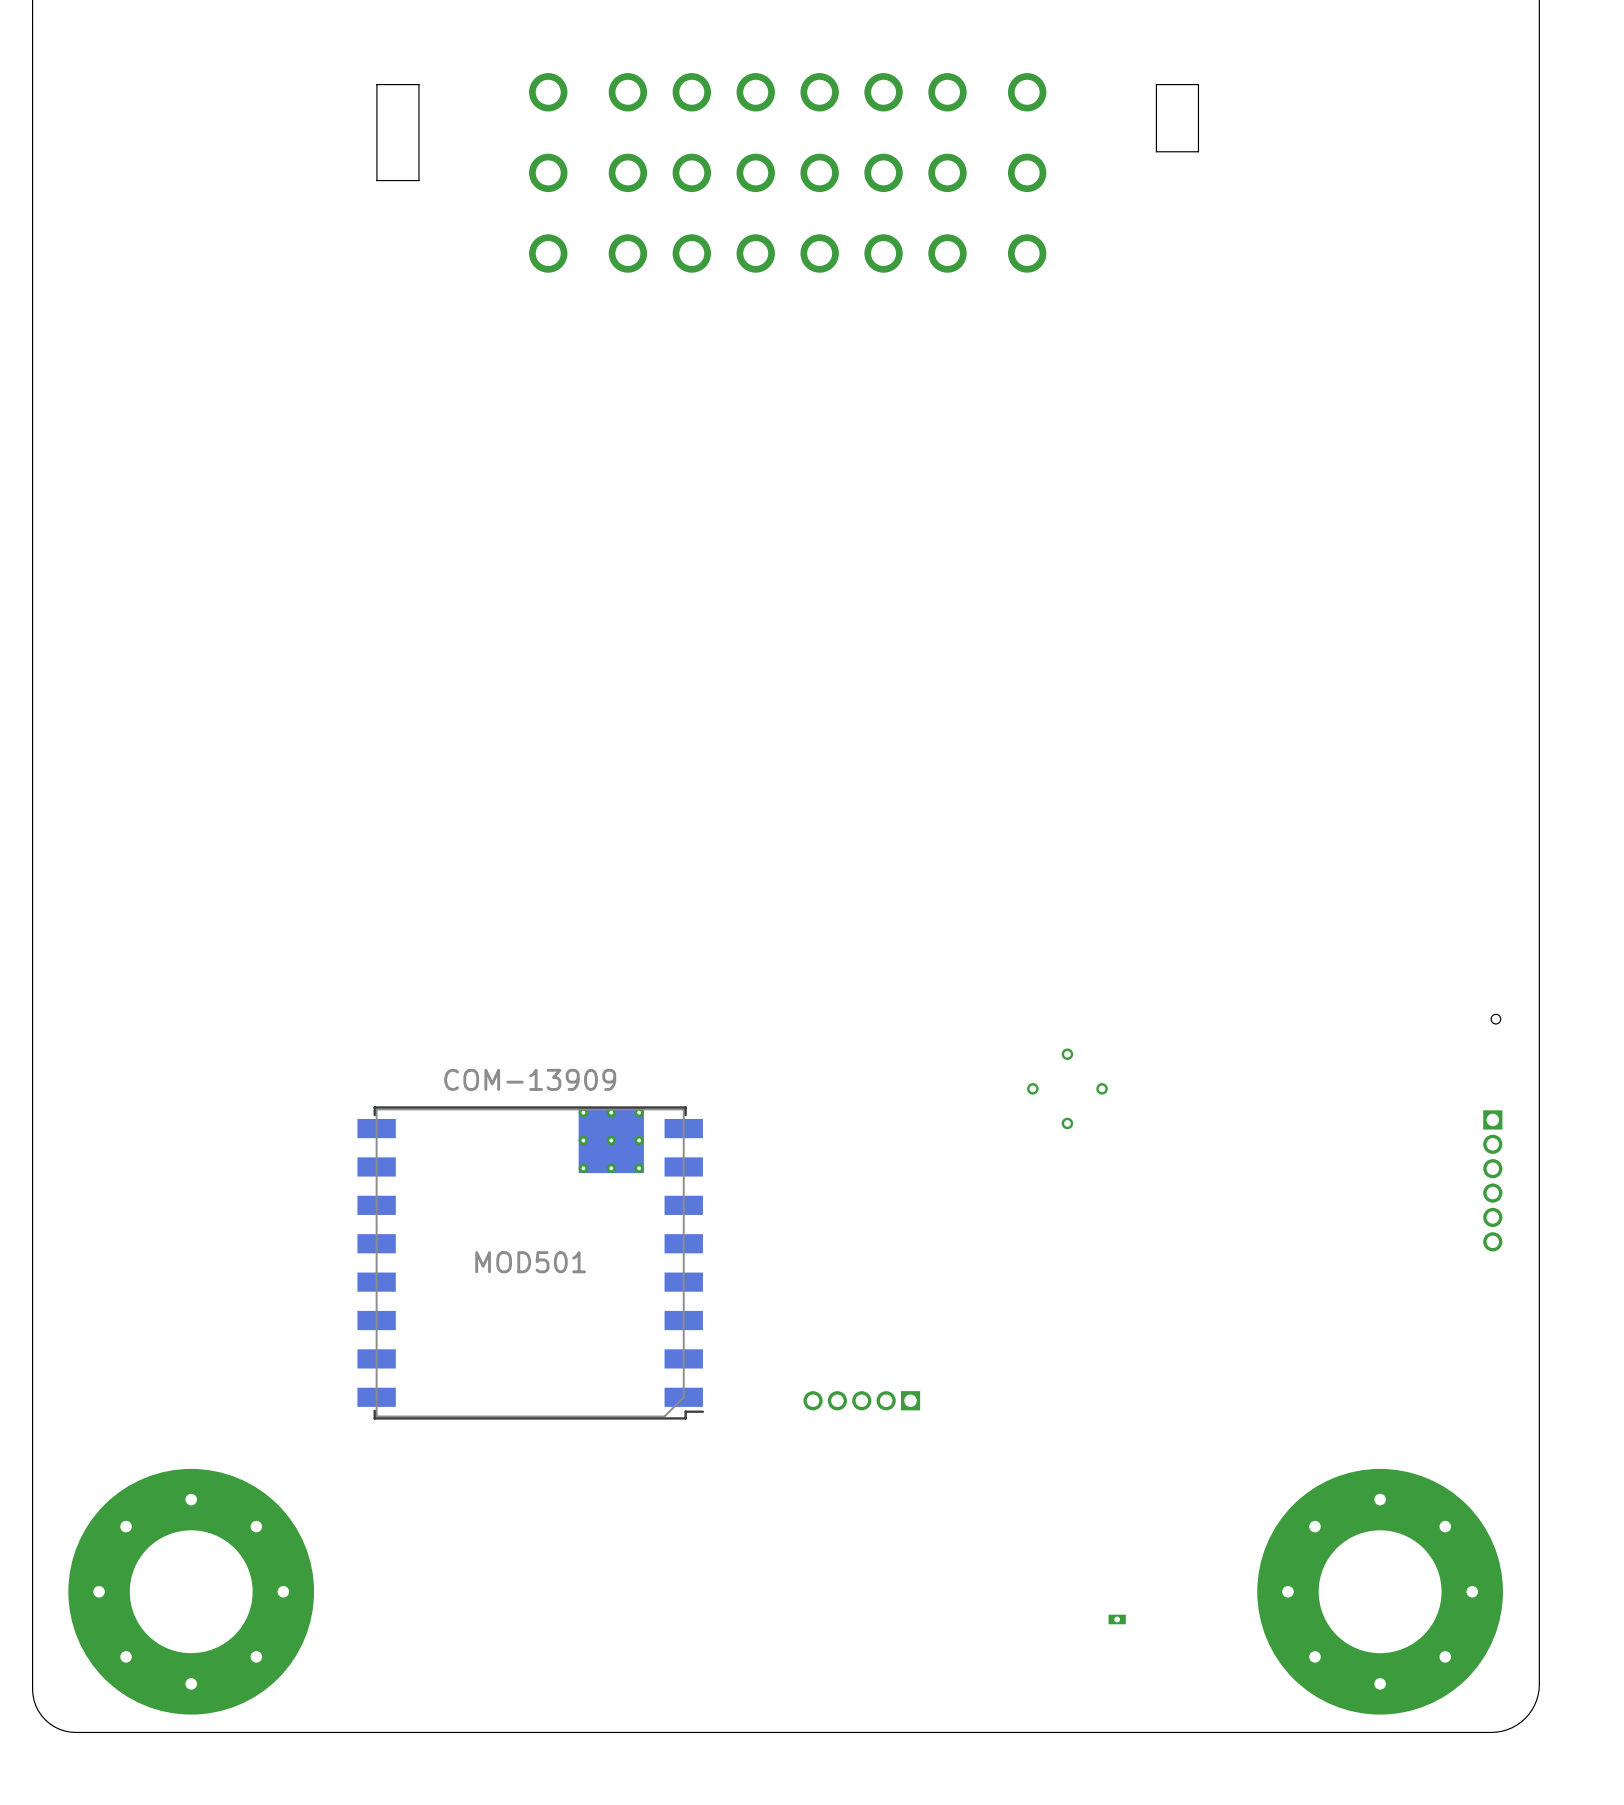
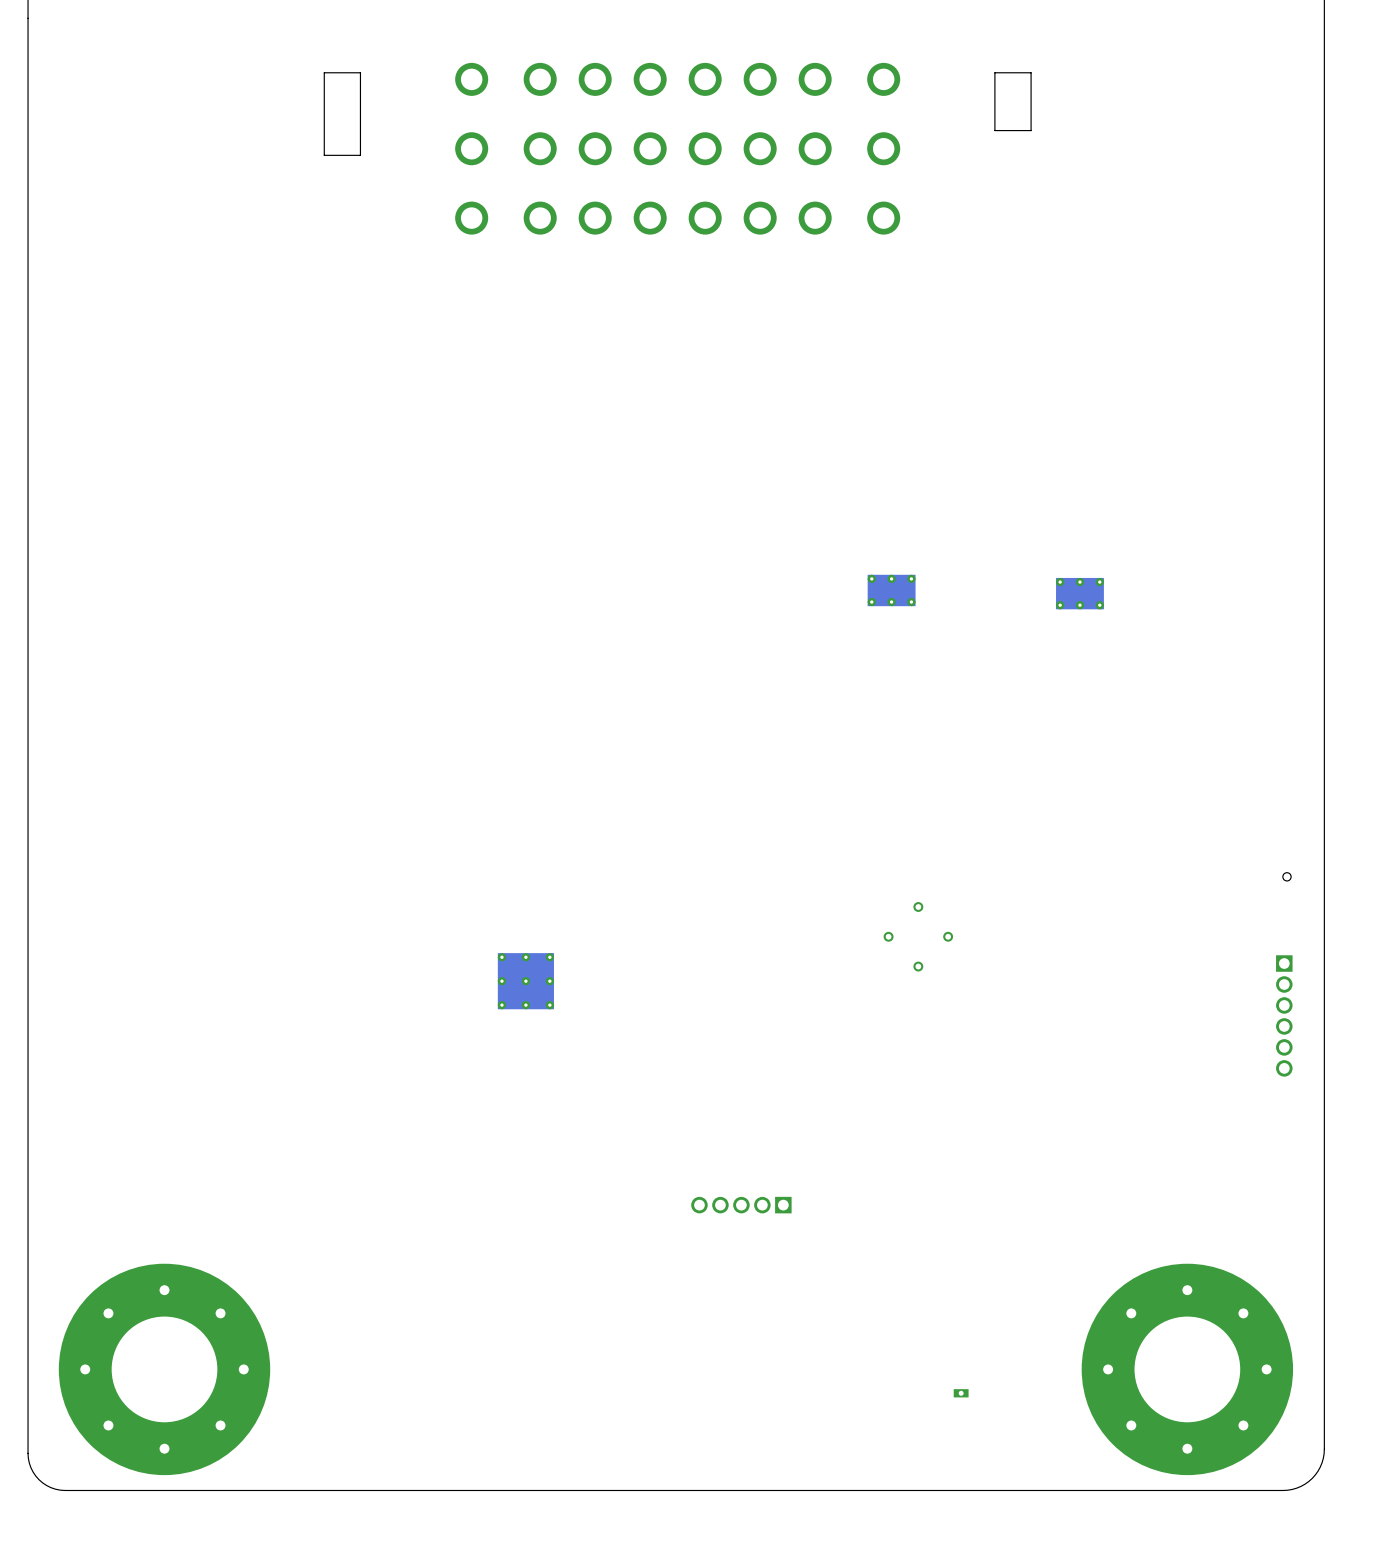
part: none -> (891, 590)
part: none -> (1079, 593)
MOD501: COM-13909 (530, 1262) -> none

